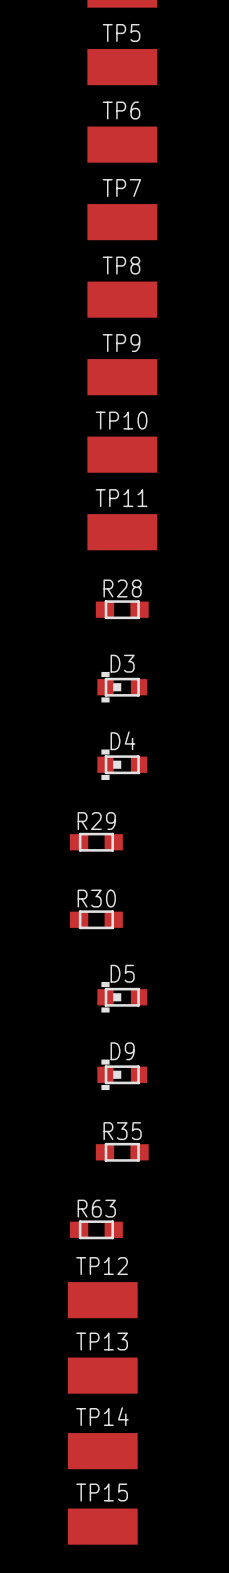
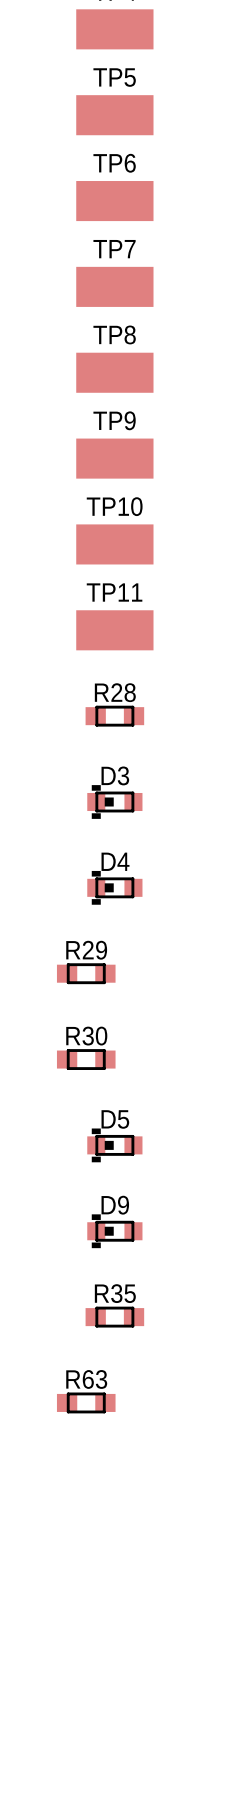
TP12: (102, 1300) -> none
TP13: (102, 1375) -> none
TP14: (102, 1451) -> none
TP15: (102, 1526) -> none

